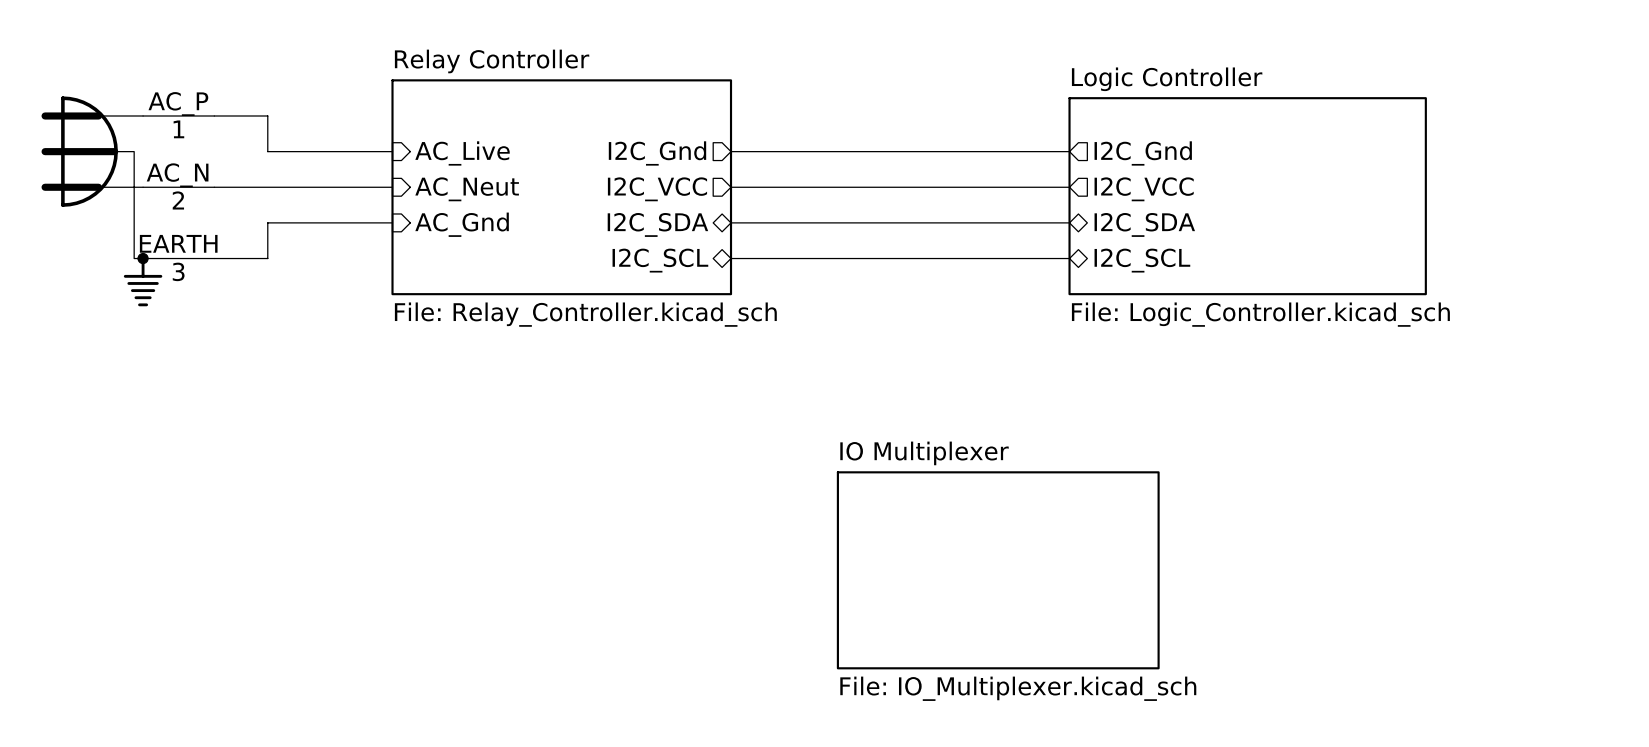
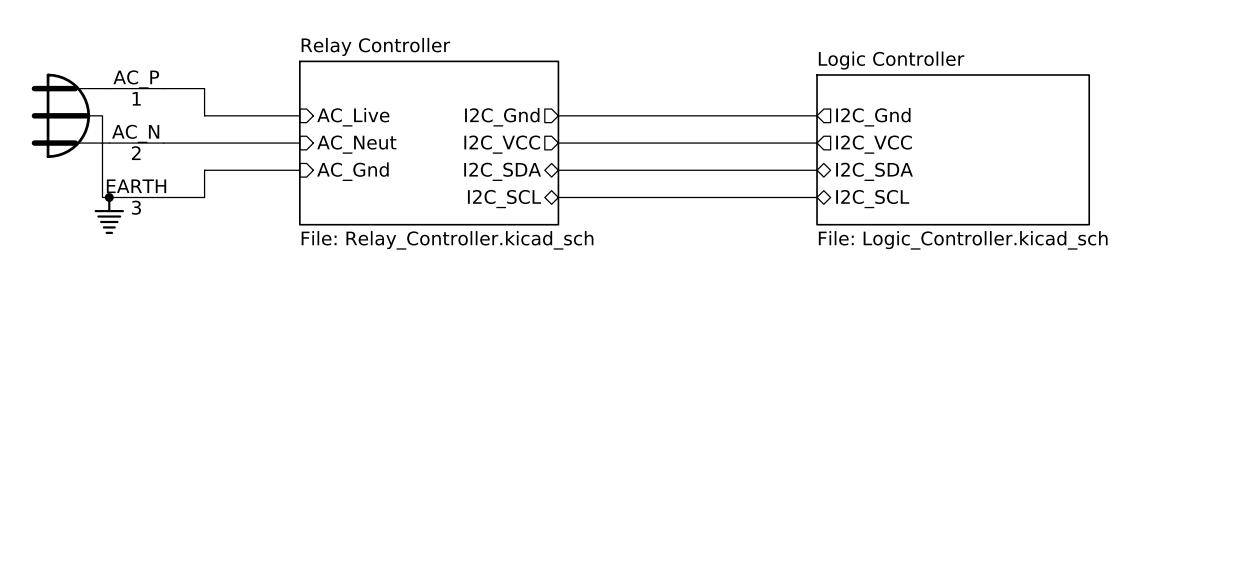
sheet IO Multiplexer: File: IO_Multiplexer.kicad_sch (998, 570) -> none

